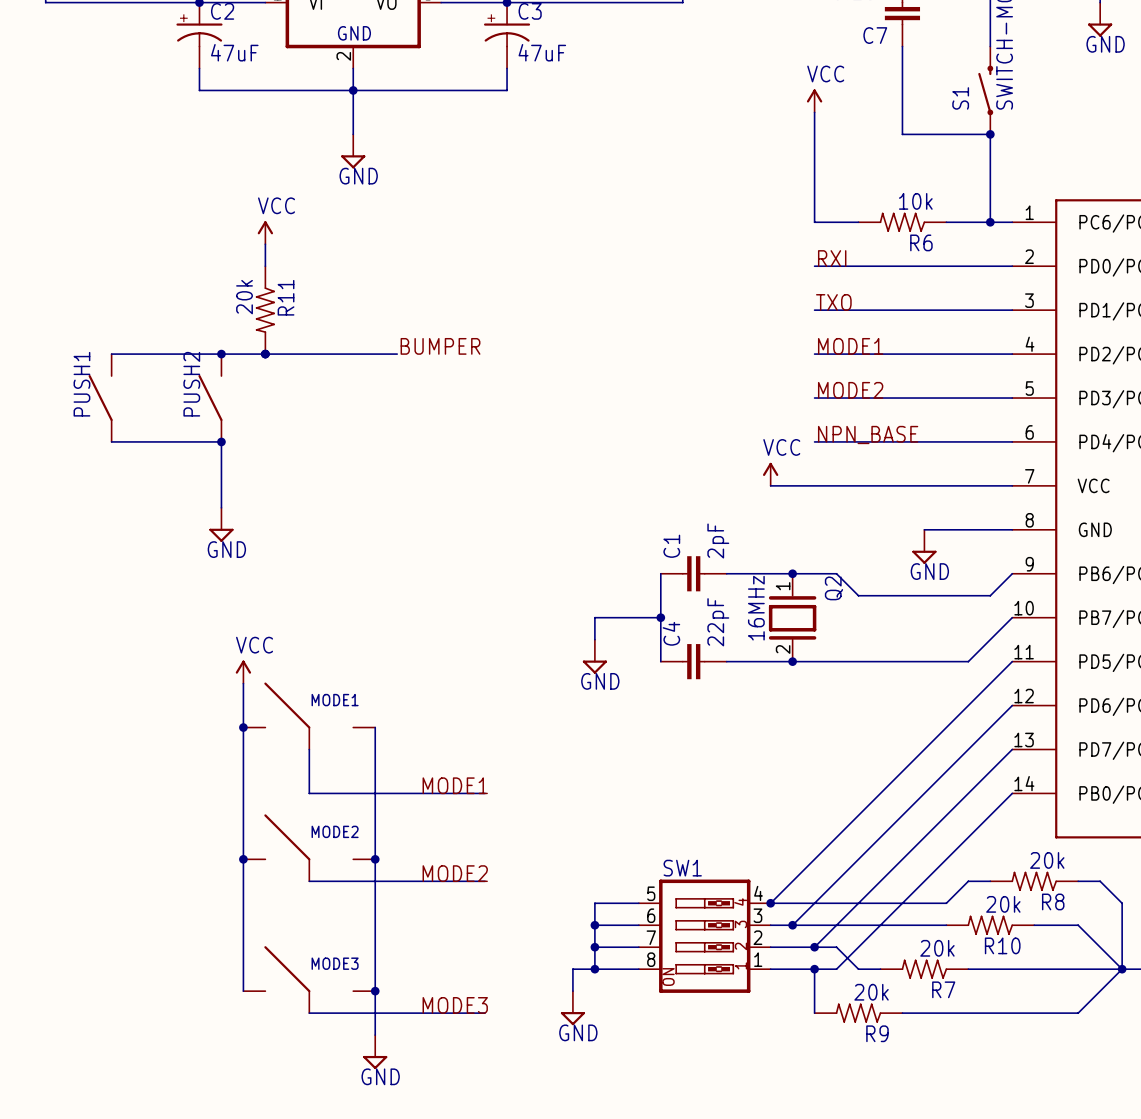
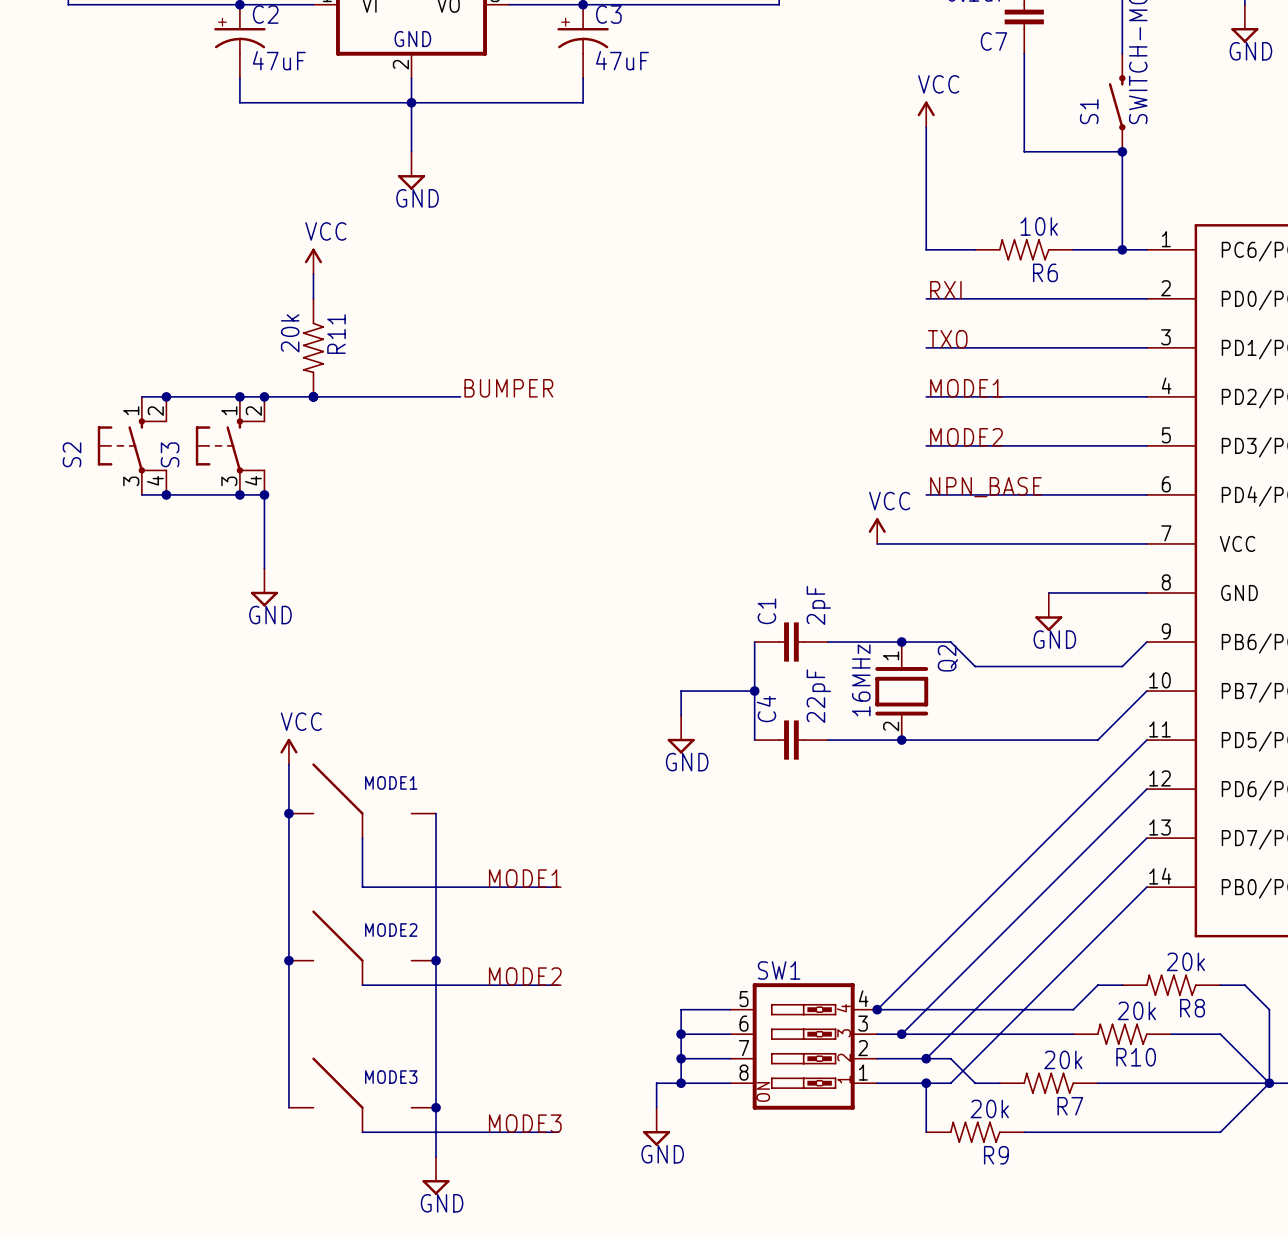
junction: none -> (166, 396)
junction: none -> (239, 396)
PUSH1: (100, 398) -> none
S2: none -> (132, 445)
S3: none -> (230, 445)
PUSH2: (210, 398) -> none
junction: none -> (166, 494)
junction: none -> (239, 494)

